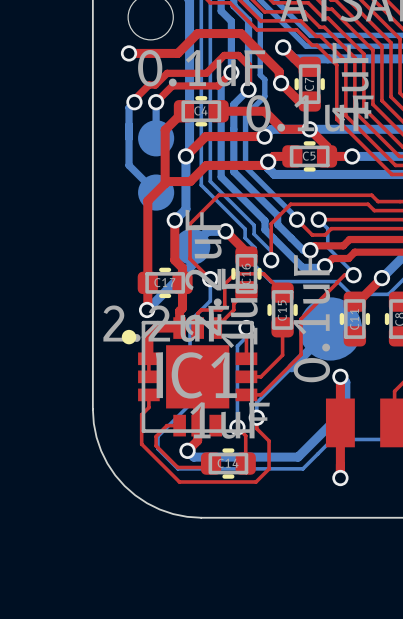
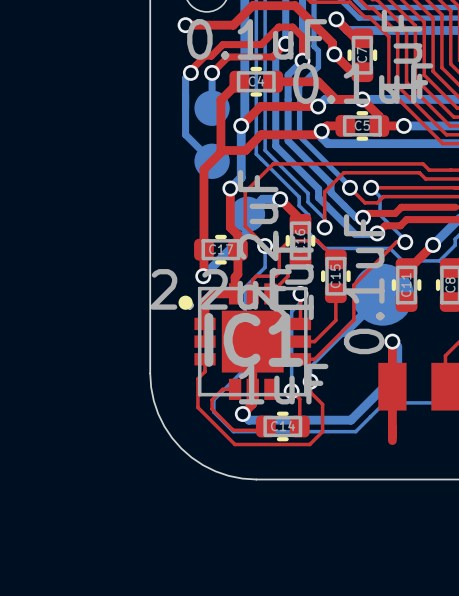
via: (340, 478) -> none

